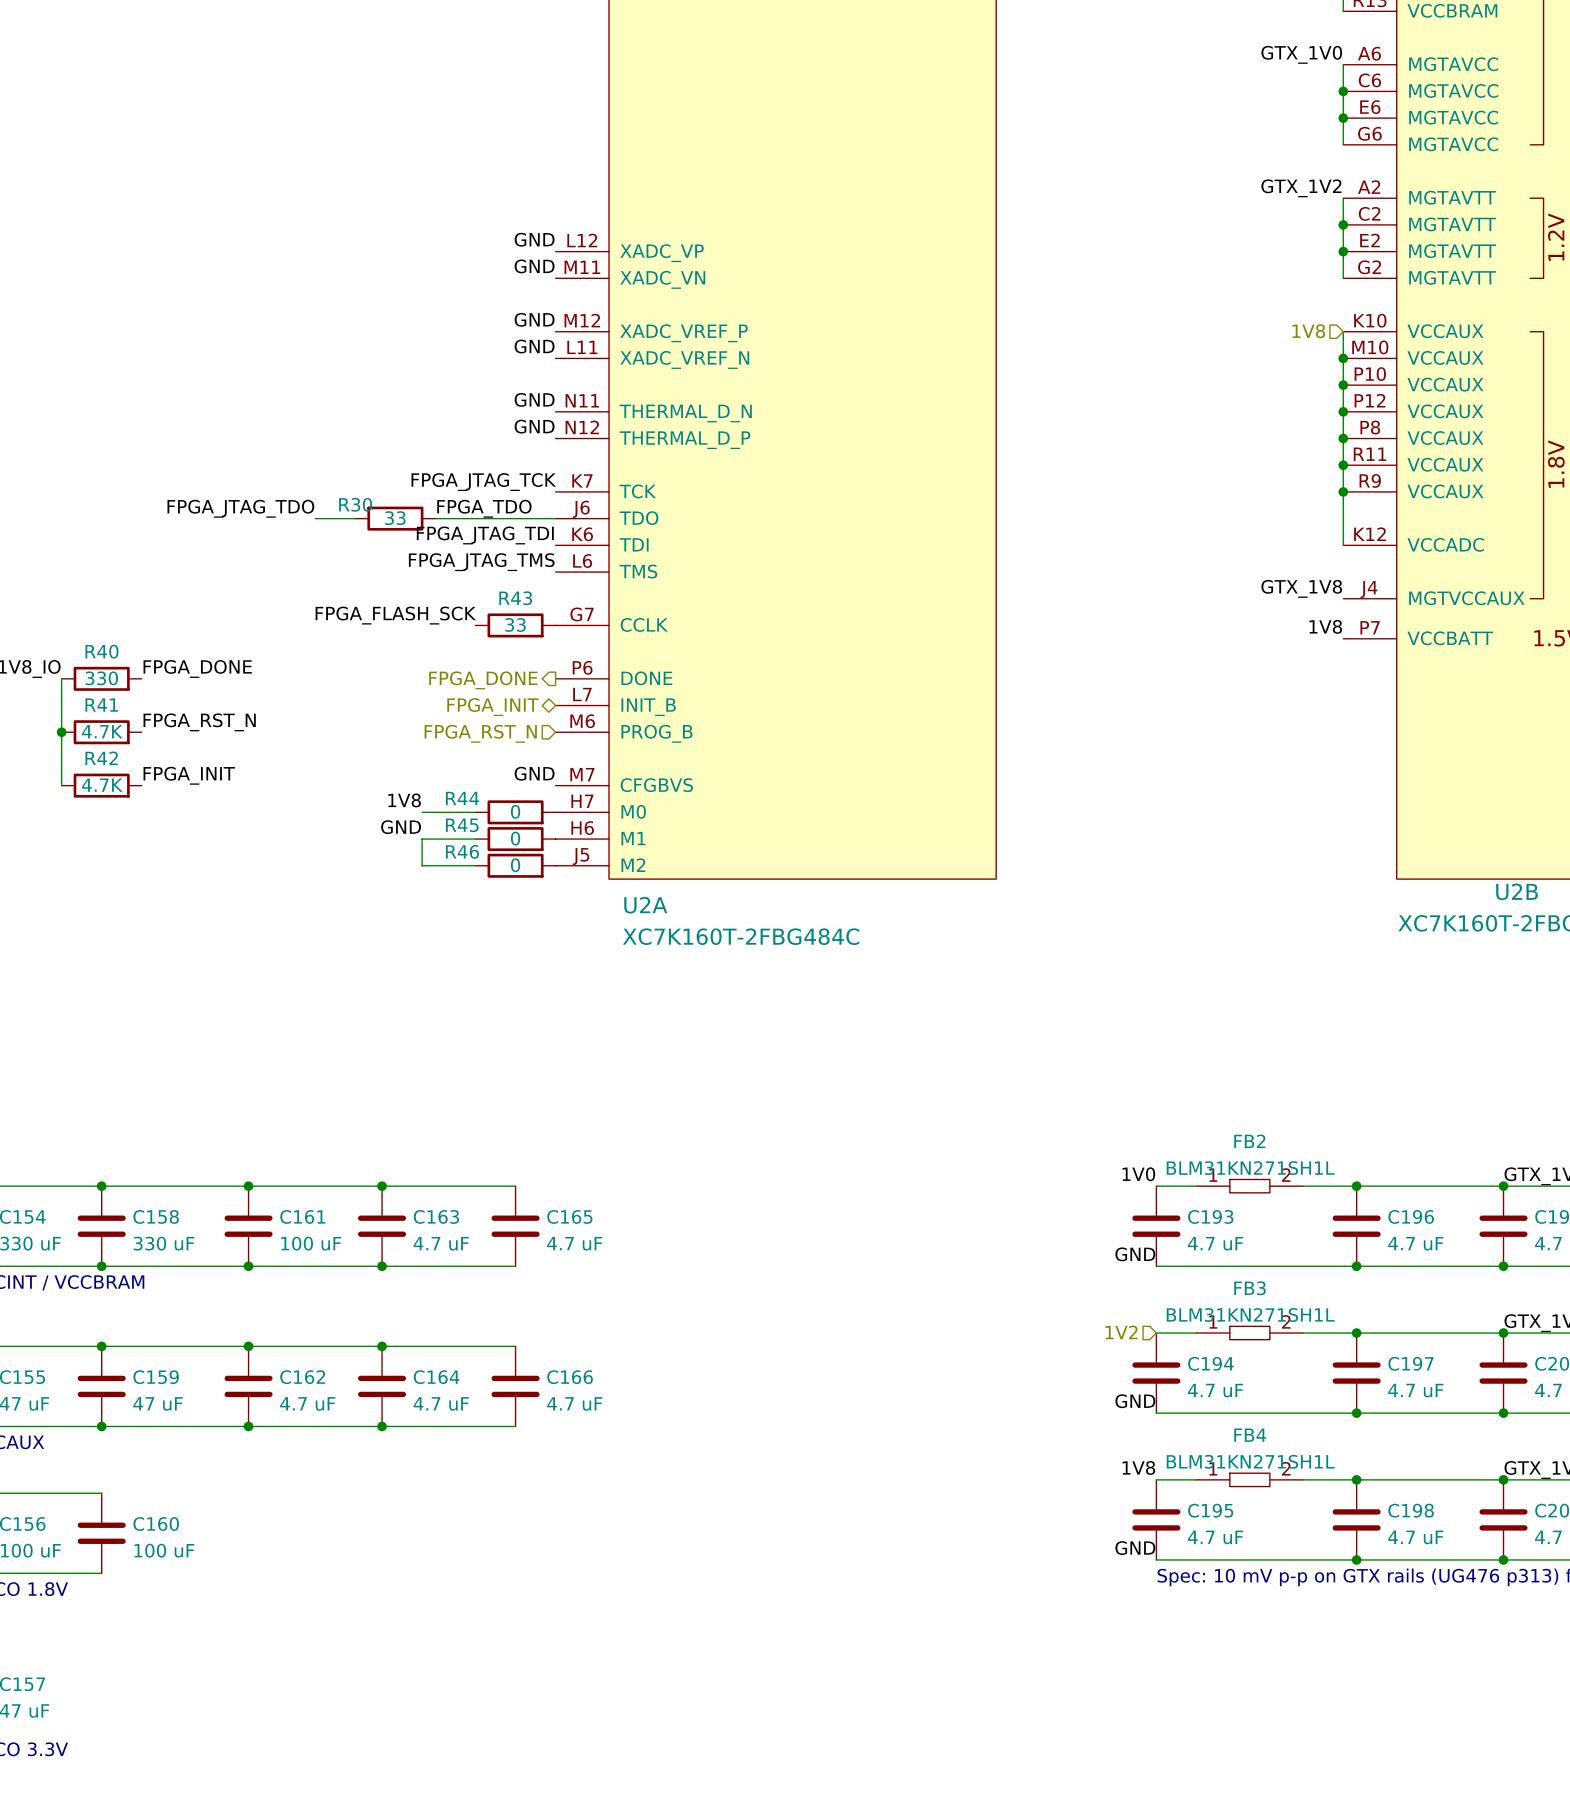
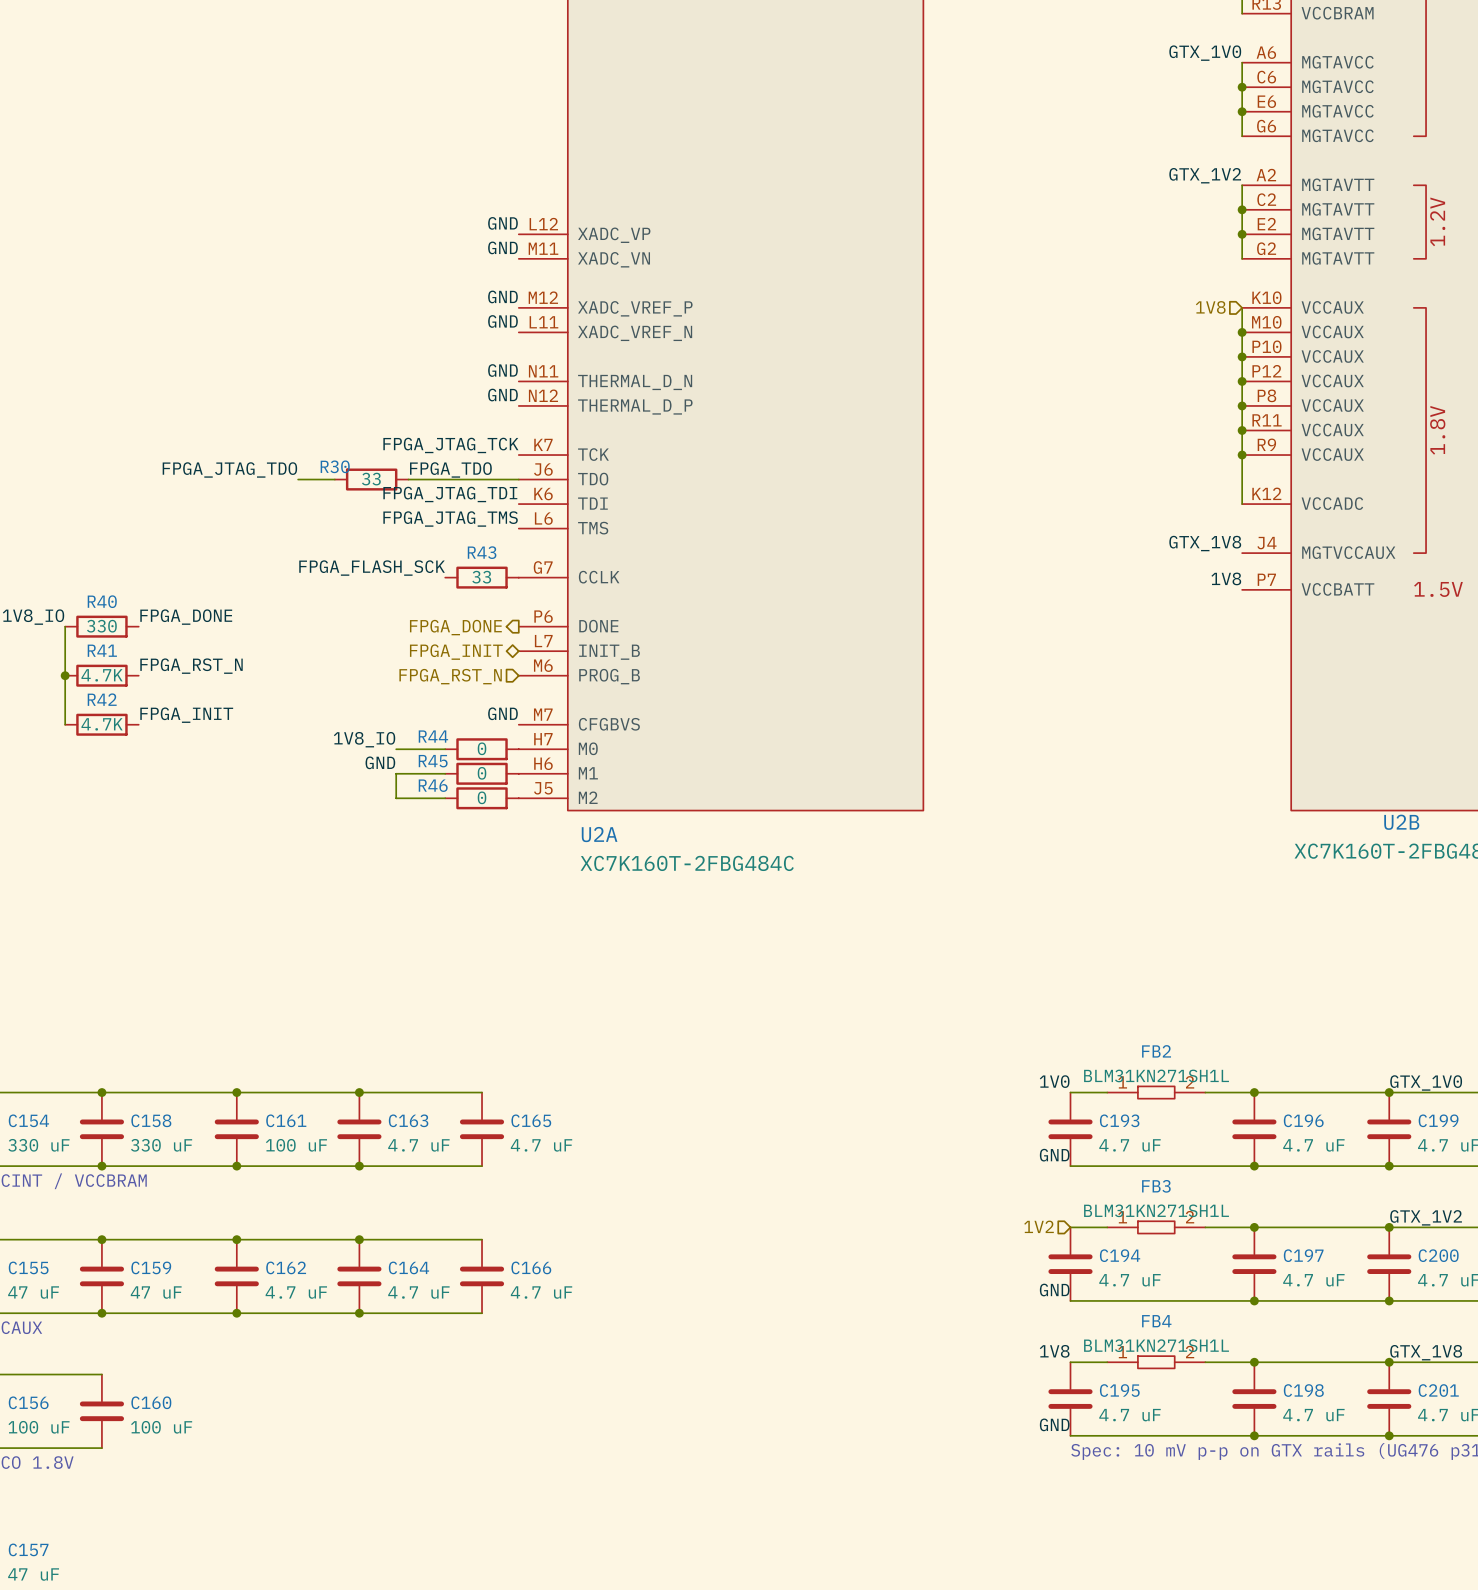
label: 1V8 (404, 800) -> 1V8_IO (364, 739)

